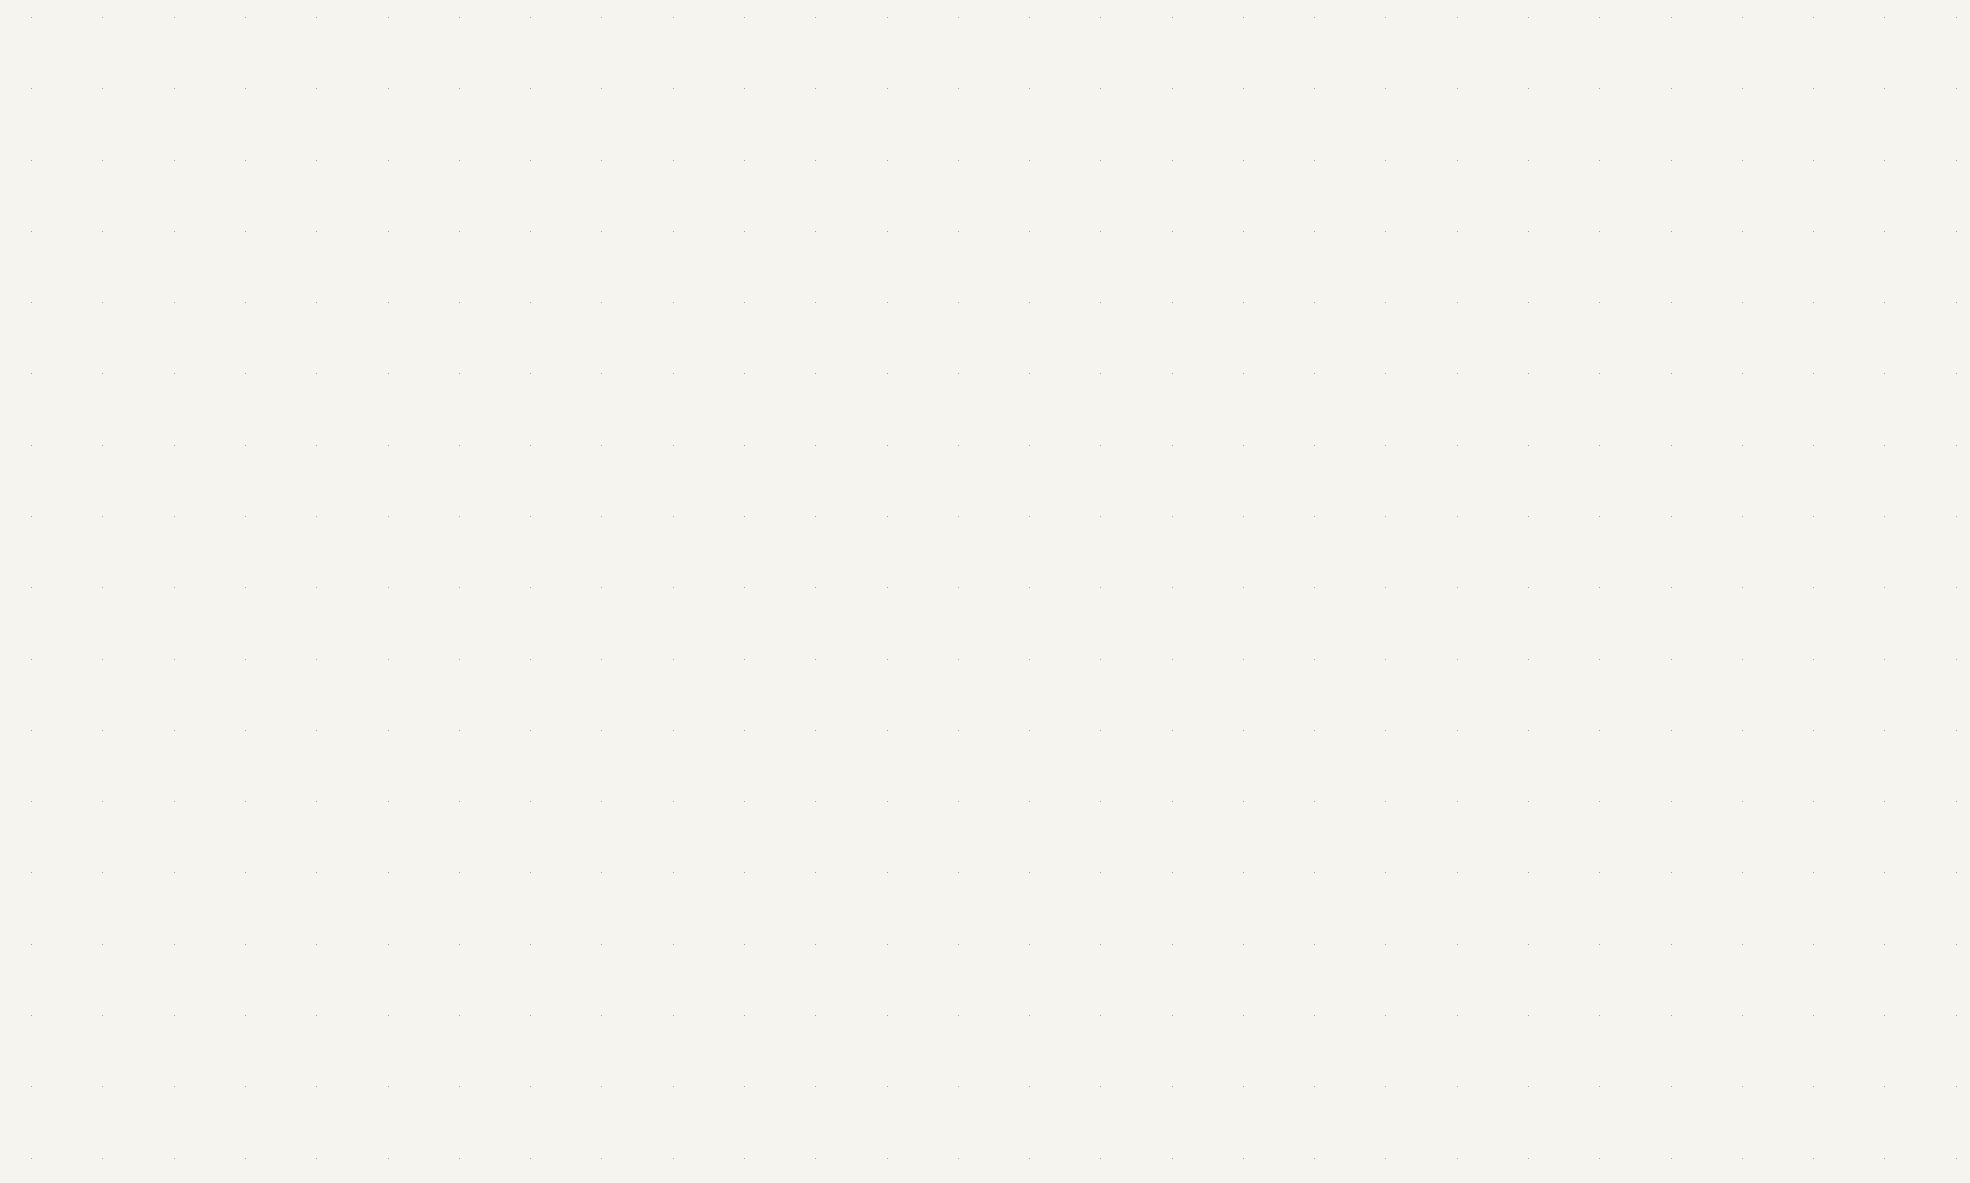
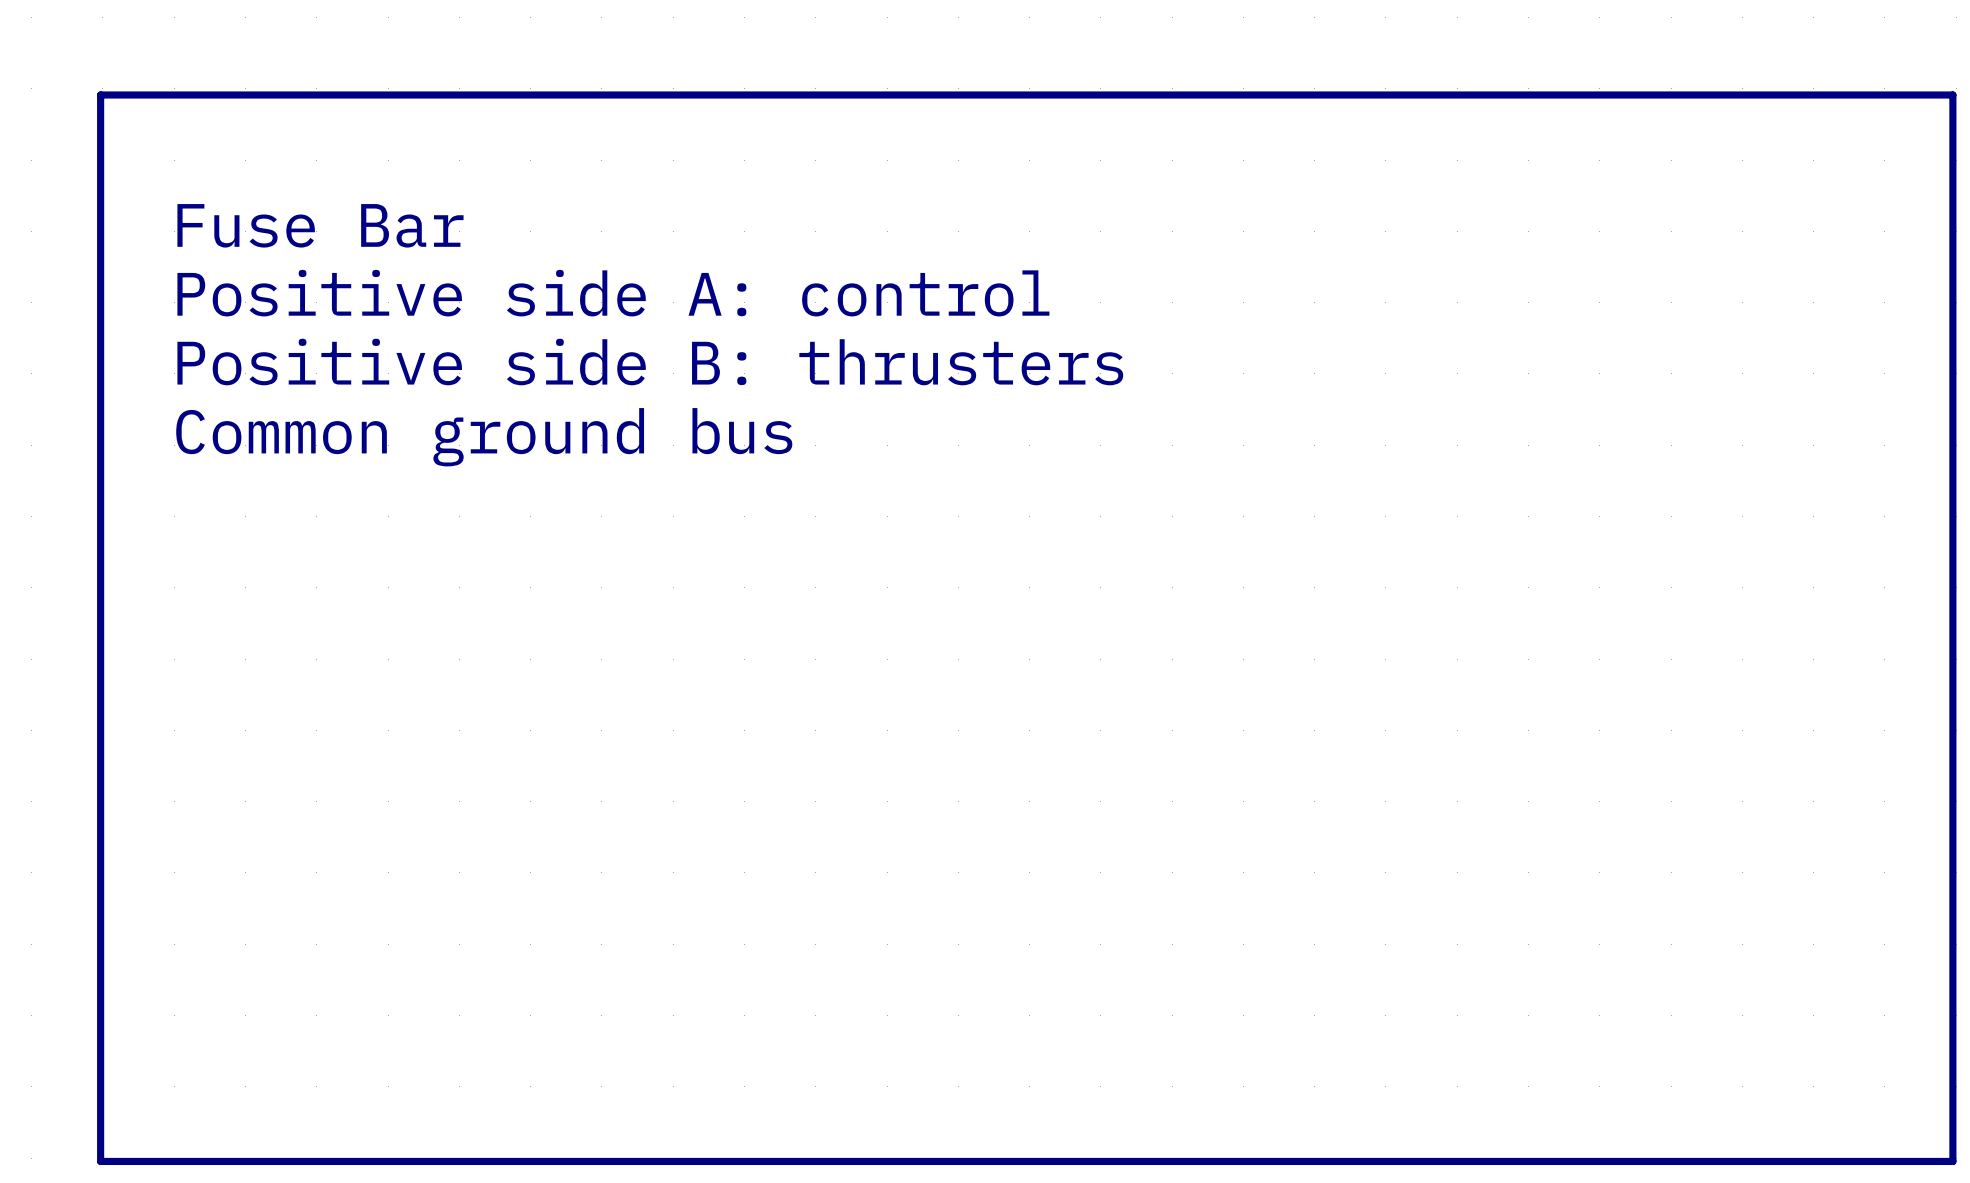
line: none -> (100, 94) (1952, 94) (1952, 1161) (100, 1161) (100, 94)
text: none -> Fuse Bar (320, 225)
text: none -> Positive side A: control (613, 293)
text: none -> Positive side B: thrusters (650, 362)
text: none -> Common ground bus (484, 437)

